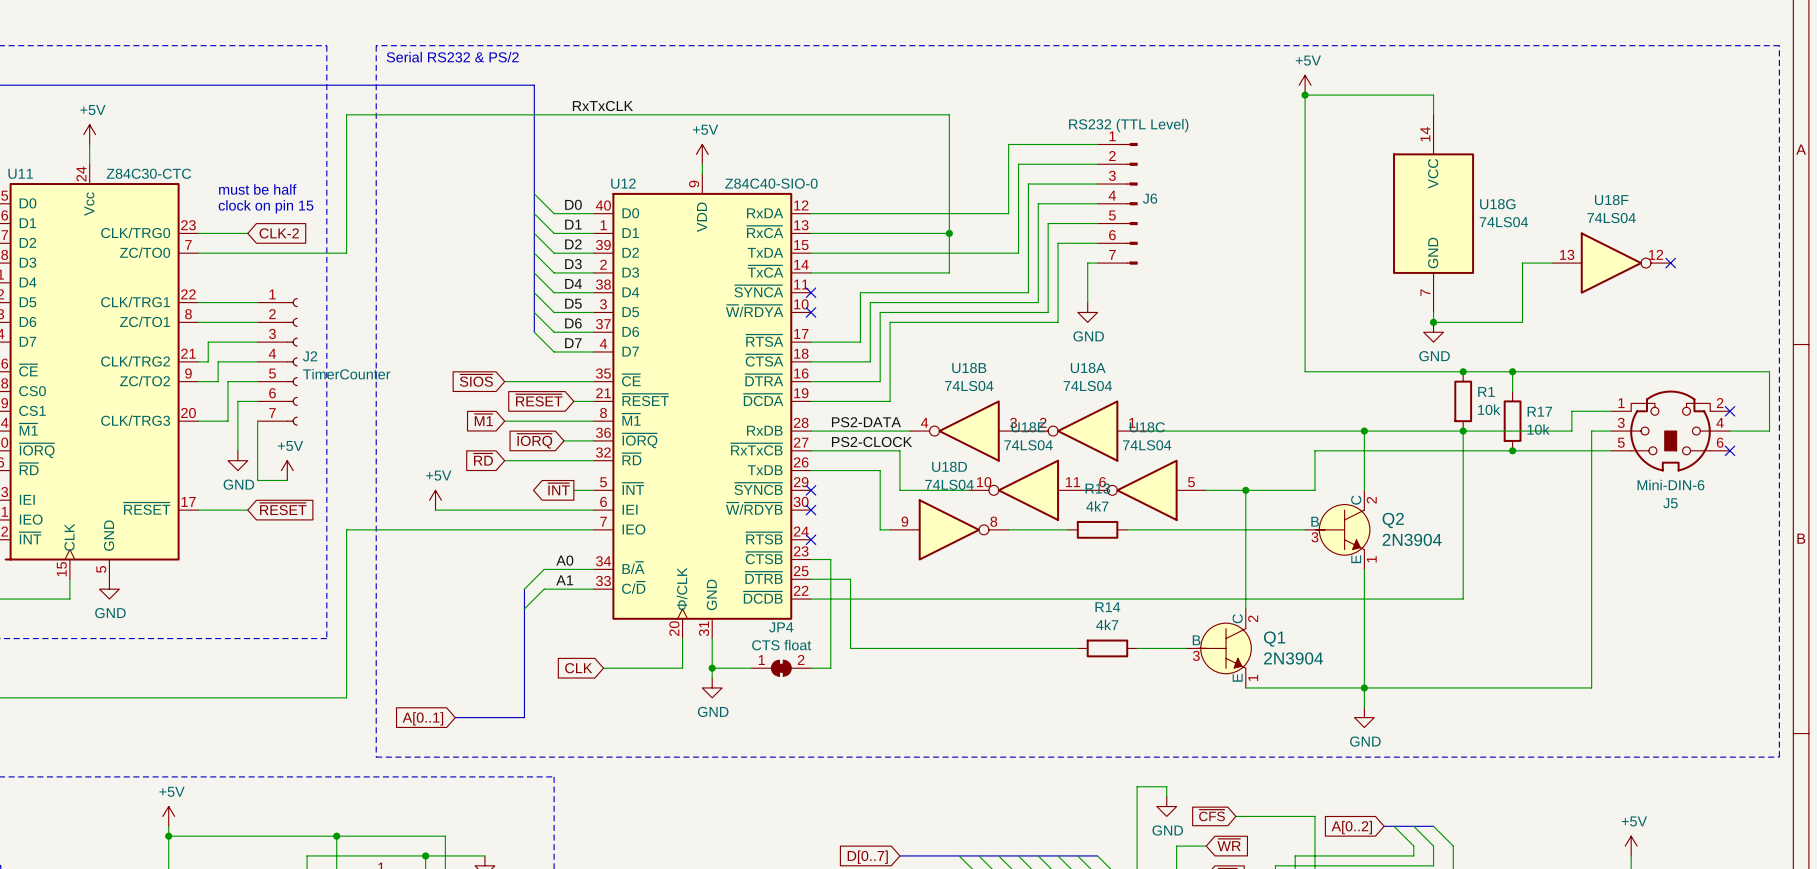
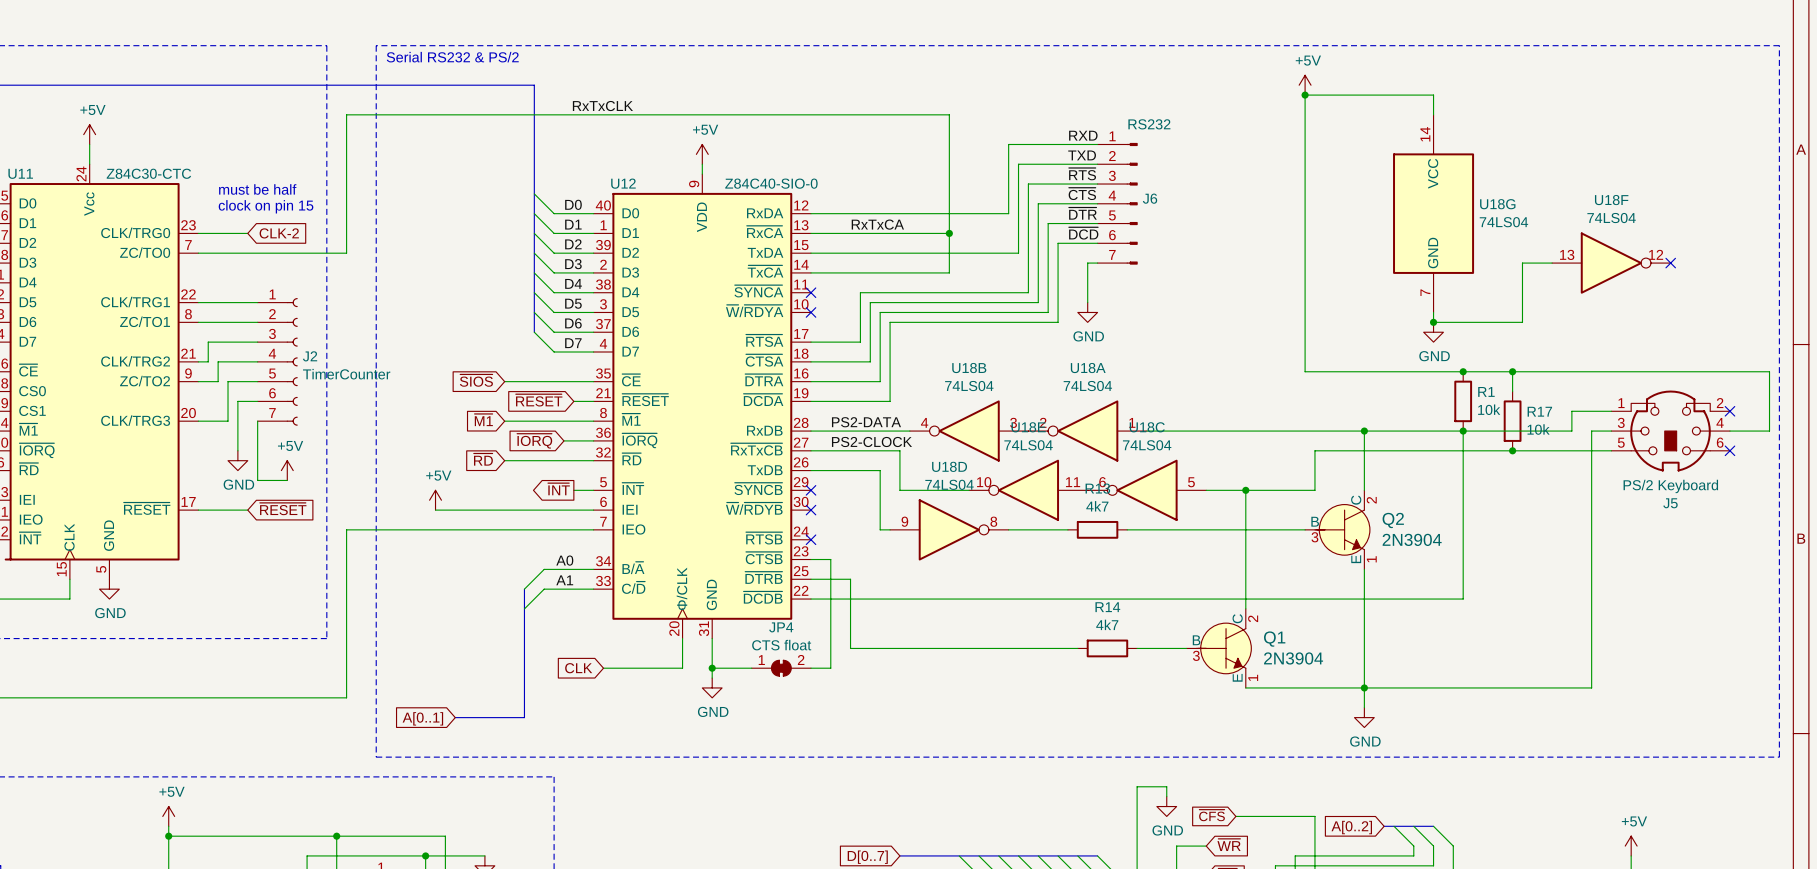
J6 value: RS232 (TTL Level) (1128, 125) -> RS232 (1149, 124)
label: none -> RXD (1083, 135)
label: none -> TXD (1082, 155)
label: none -> ~{RTS} (1082, 174)
label: none -> ~{CTS} (1082, 193)
label: none -> ~{DTR} (1082, 213)
label: none -> RxTxCA (877, 224)
label: none -> ~{DCD} (1083, 233)
J5 value: Mini-DIN-6 (1670, 485) -> PS/2 Keyboard (1670, 486)

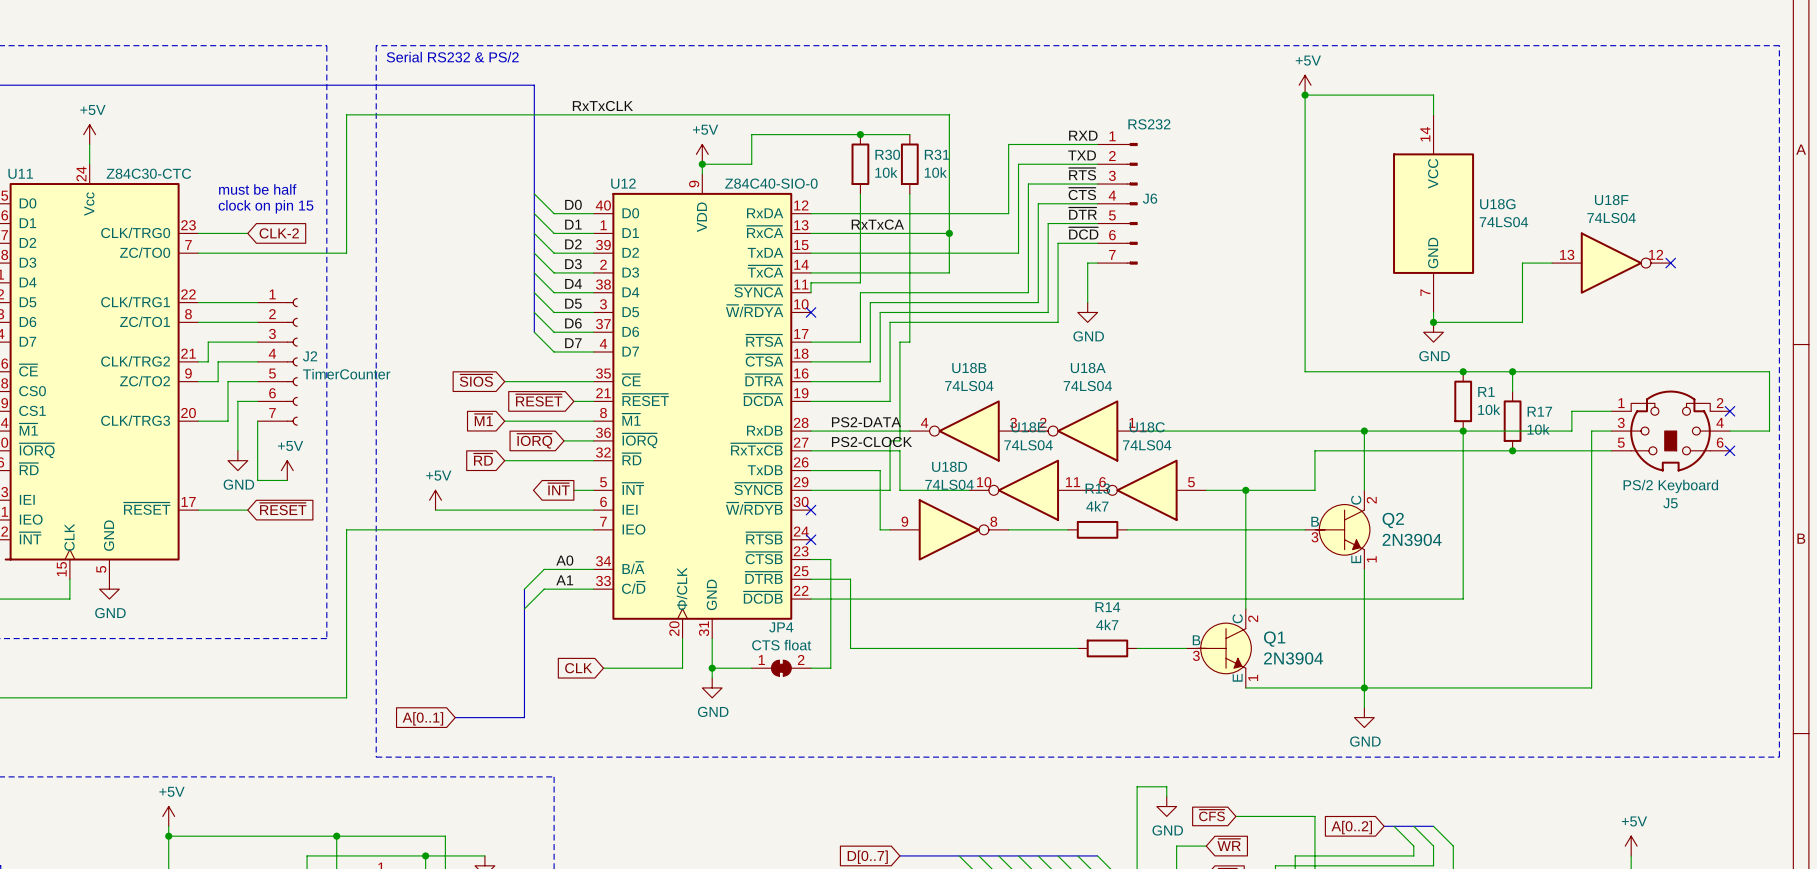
junction: none -> (860, 134)
wire: none -> (909, 134) (751, 134) (751, 164) (702, 164)
junction: none -> (702, 164)
R30: none -> 10k (860, 164)
R31: none -> 10k (909, 164)
wire: none -> (860, 193) (860, 282) (811, 282) (811, 292)
wire: none -> (909, 193) (909, 342) (899, 342) (899, 440) (890, 440) (890, 490) (811, 490)
no-connect mark: (811, 292) -> none
no-connect mark: (811, 490) -> none

